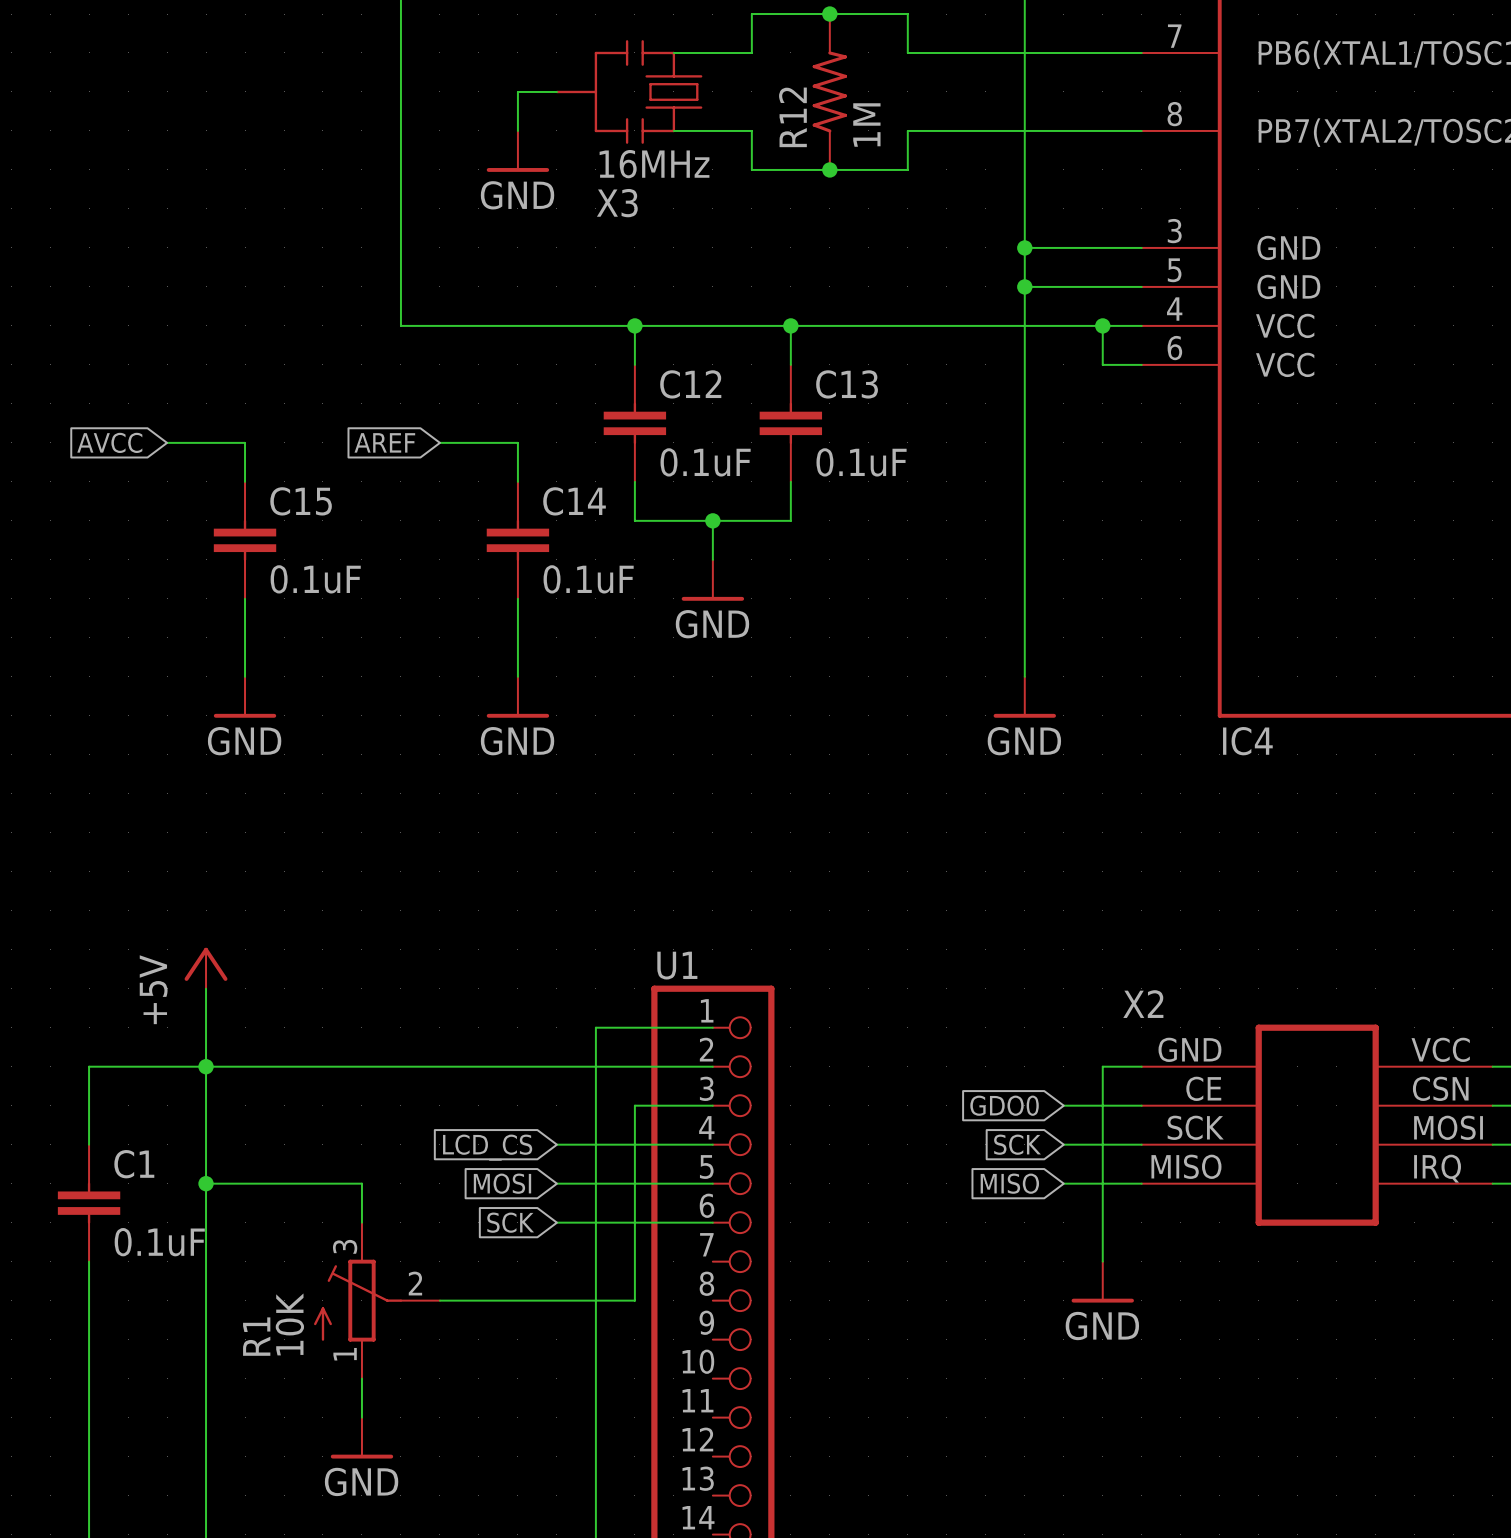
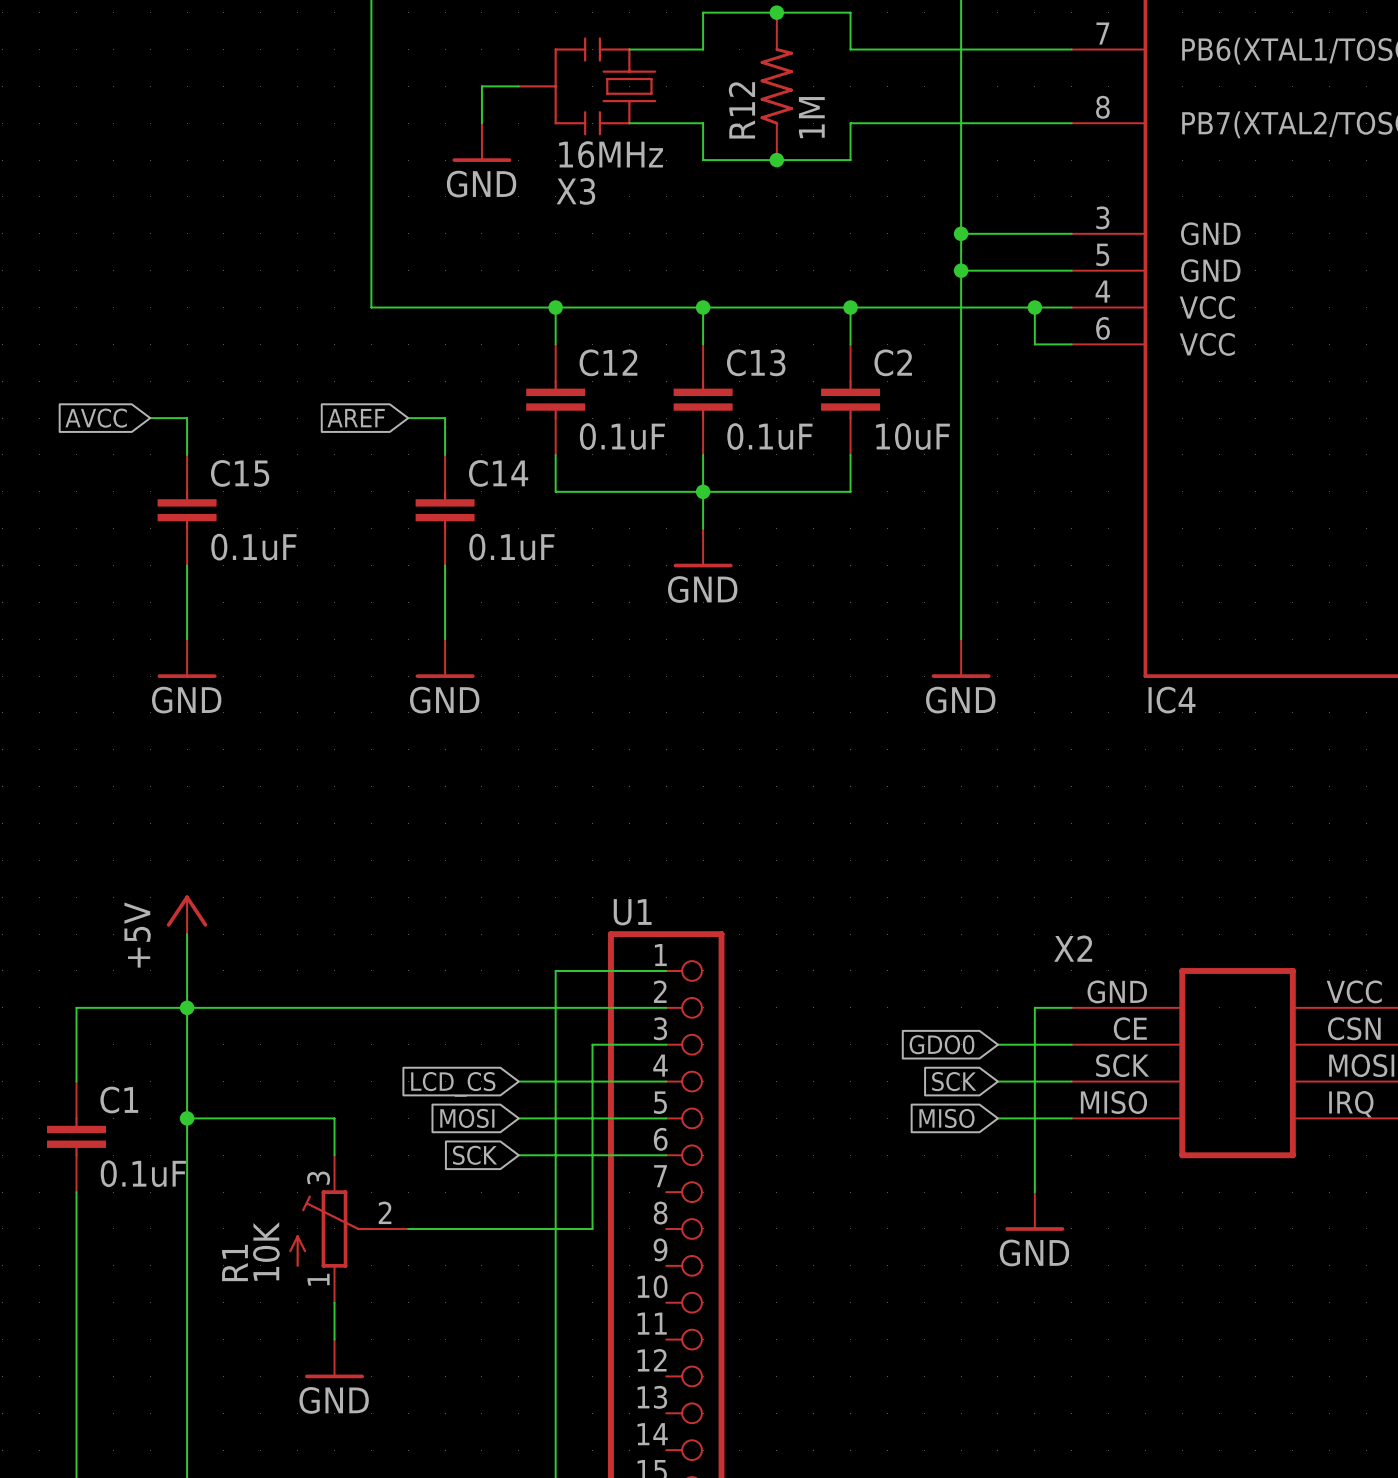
wire: (634, 325) (634, 364) -> (555, 307) (555, 344)
junction position: (634, 325) -> (555, 307)
wire: (790, 325) (790, 364) -> (703, 307) (703, 344)
junction position: (790, 325) -> (703, 307)
junction: none -> (850, 307)
C12 position: (634, 423) -> (555, 399)
C13 position: (790, 423) -> (703, 399)
C2: none -> 10uF (850, 399)
wire: (206, 442) (245, 442) (245, 481) -> (187, 418) (187, 454)
wire: (478, 442) (517, 442) (517, 481) -> (445, 418) (445, 454)
wire: (634, 481) (634, 520) -> (555, 454) (555, 491) (592, 491)
wire: none -> (703, 454) (703, 528)
wire: (790, 481) (790, 520) -> (850, 454) (850, 491) (739, 491)
wire: (712, 520) (712, 559) -> (850, 307) (850, 344)
junction position: (712, 520) -> (703, 491)
C15 position: (245, 540) -> (187, 510)
C14 position: (517, 540) -> (445, 510)
power symbol position: GND (712, 580) -> GND (703, 548)
wire: (245, 598) (245, 676) -> (187, 565) (187, 639)
wire: (517, 598) (517, 676) -> (445, 565) (445, 639)
power symbol position: GND (245, 697) -> GND (187, 658)
power symbol position: GND (517, 697) -> GND (445, 658)

